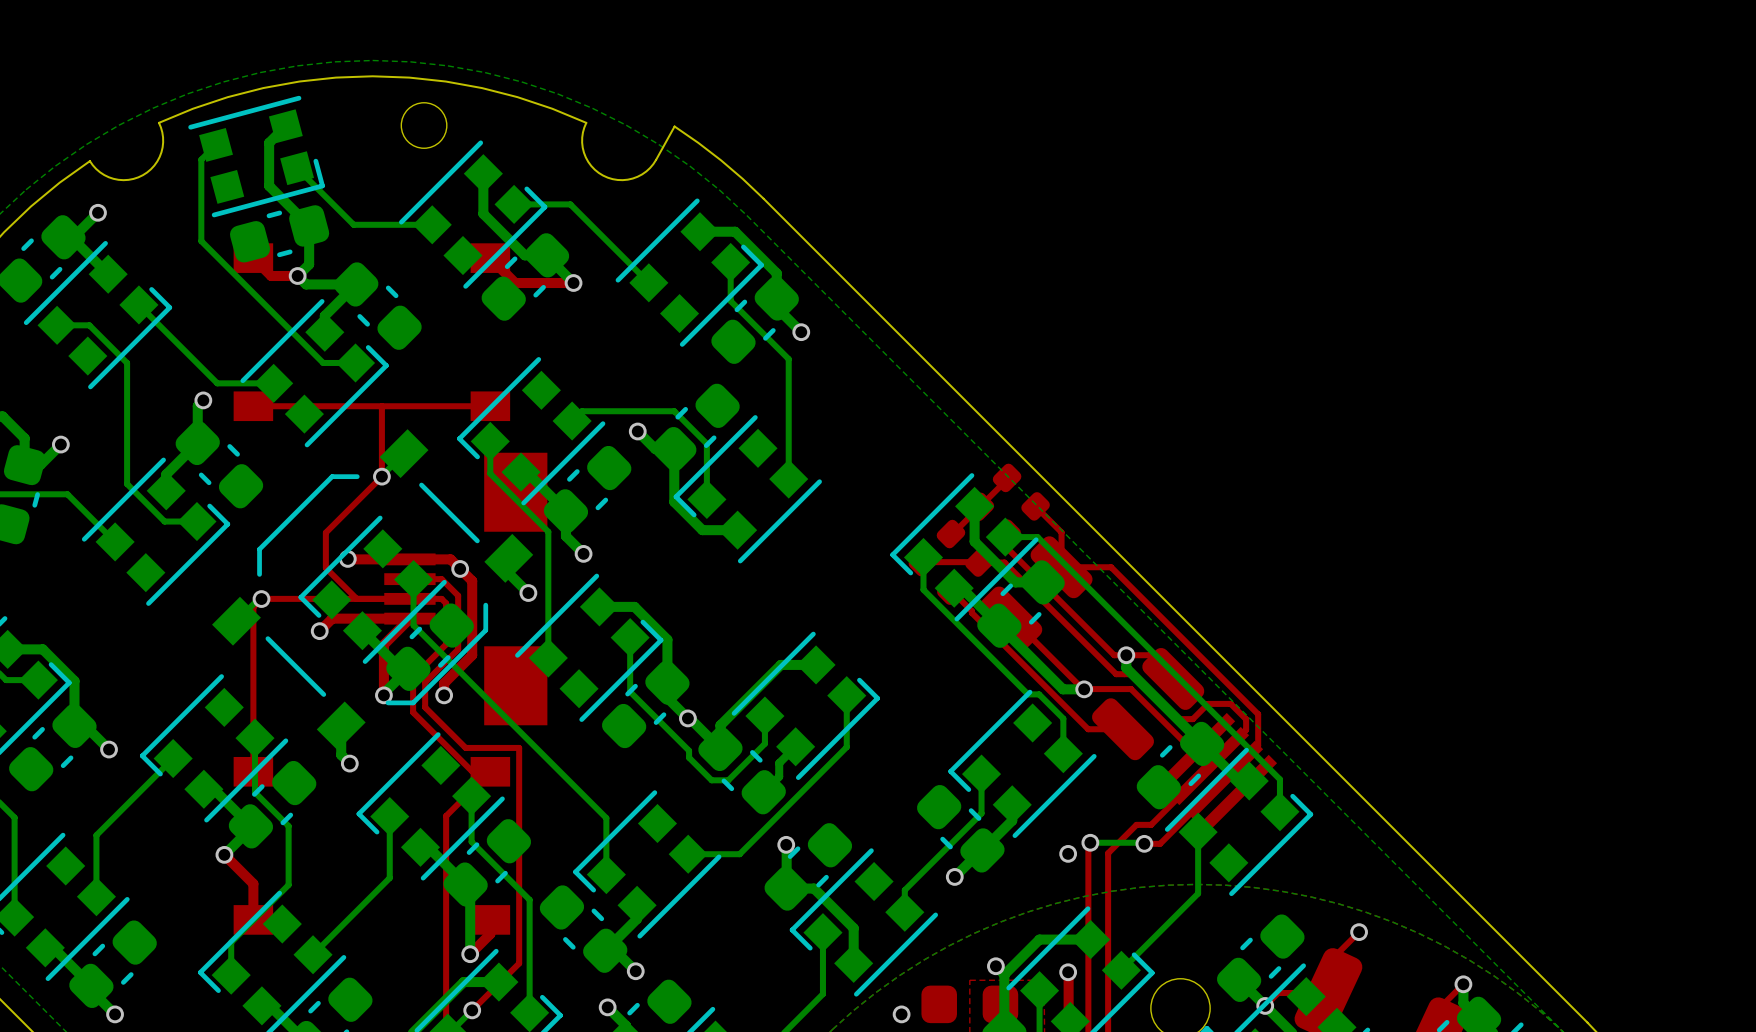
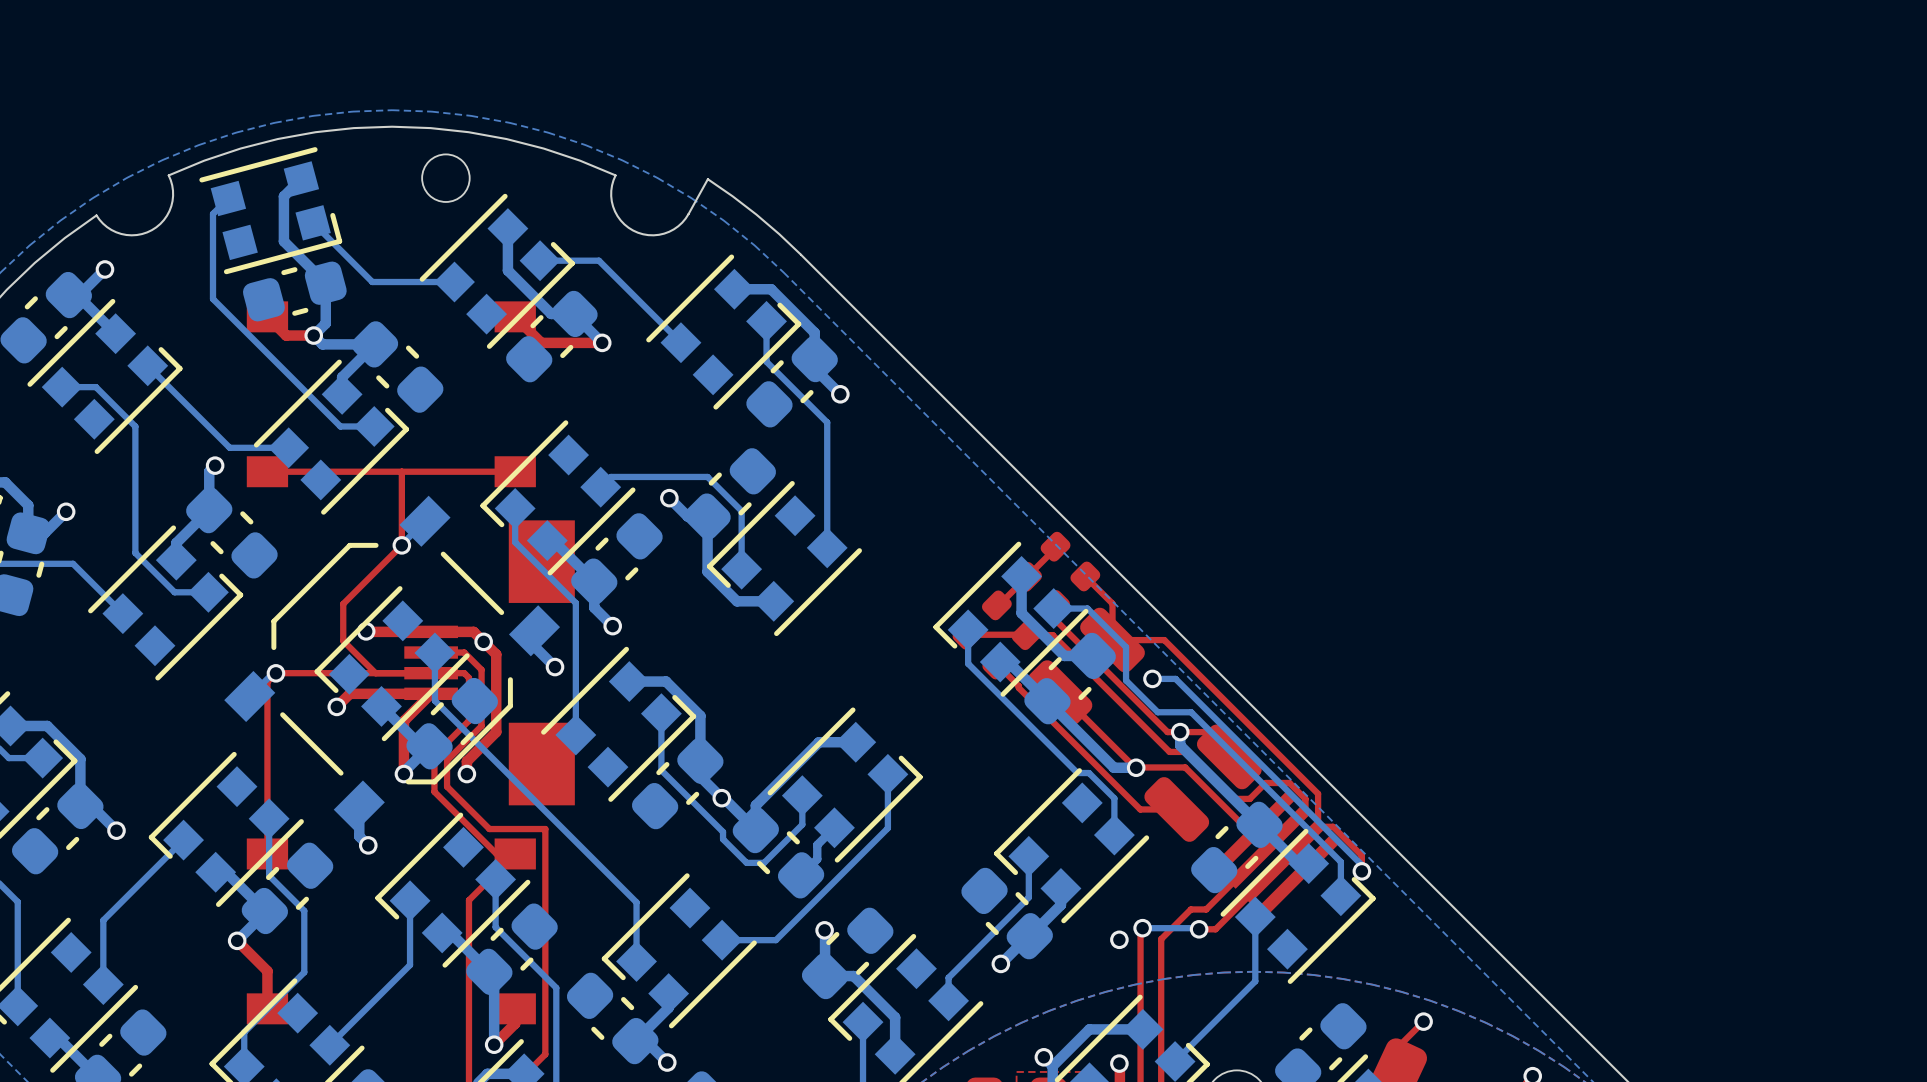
bottom track: (1074, 573) (1136, 636) -> (1126, 647) (1126, 680) (1157, 712) (1191, 712)
bottom track: none -> (1152, 678) (1175, 678) (1361, 865) (1361, 871)
via: none -> (1152, 678)
top track: none -> (1318, 826) (1333, 826) (1361, 855) (1361, 871)
via: none -> (1361, 871)

